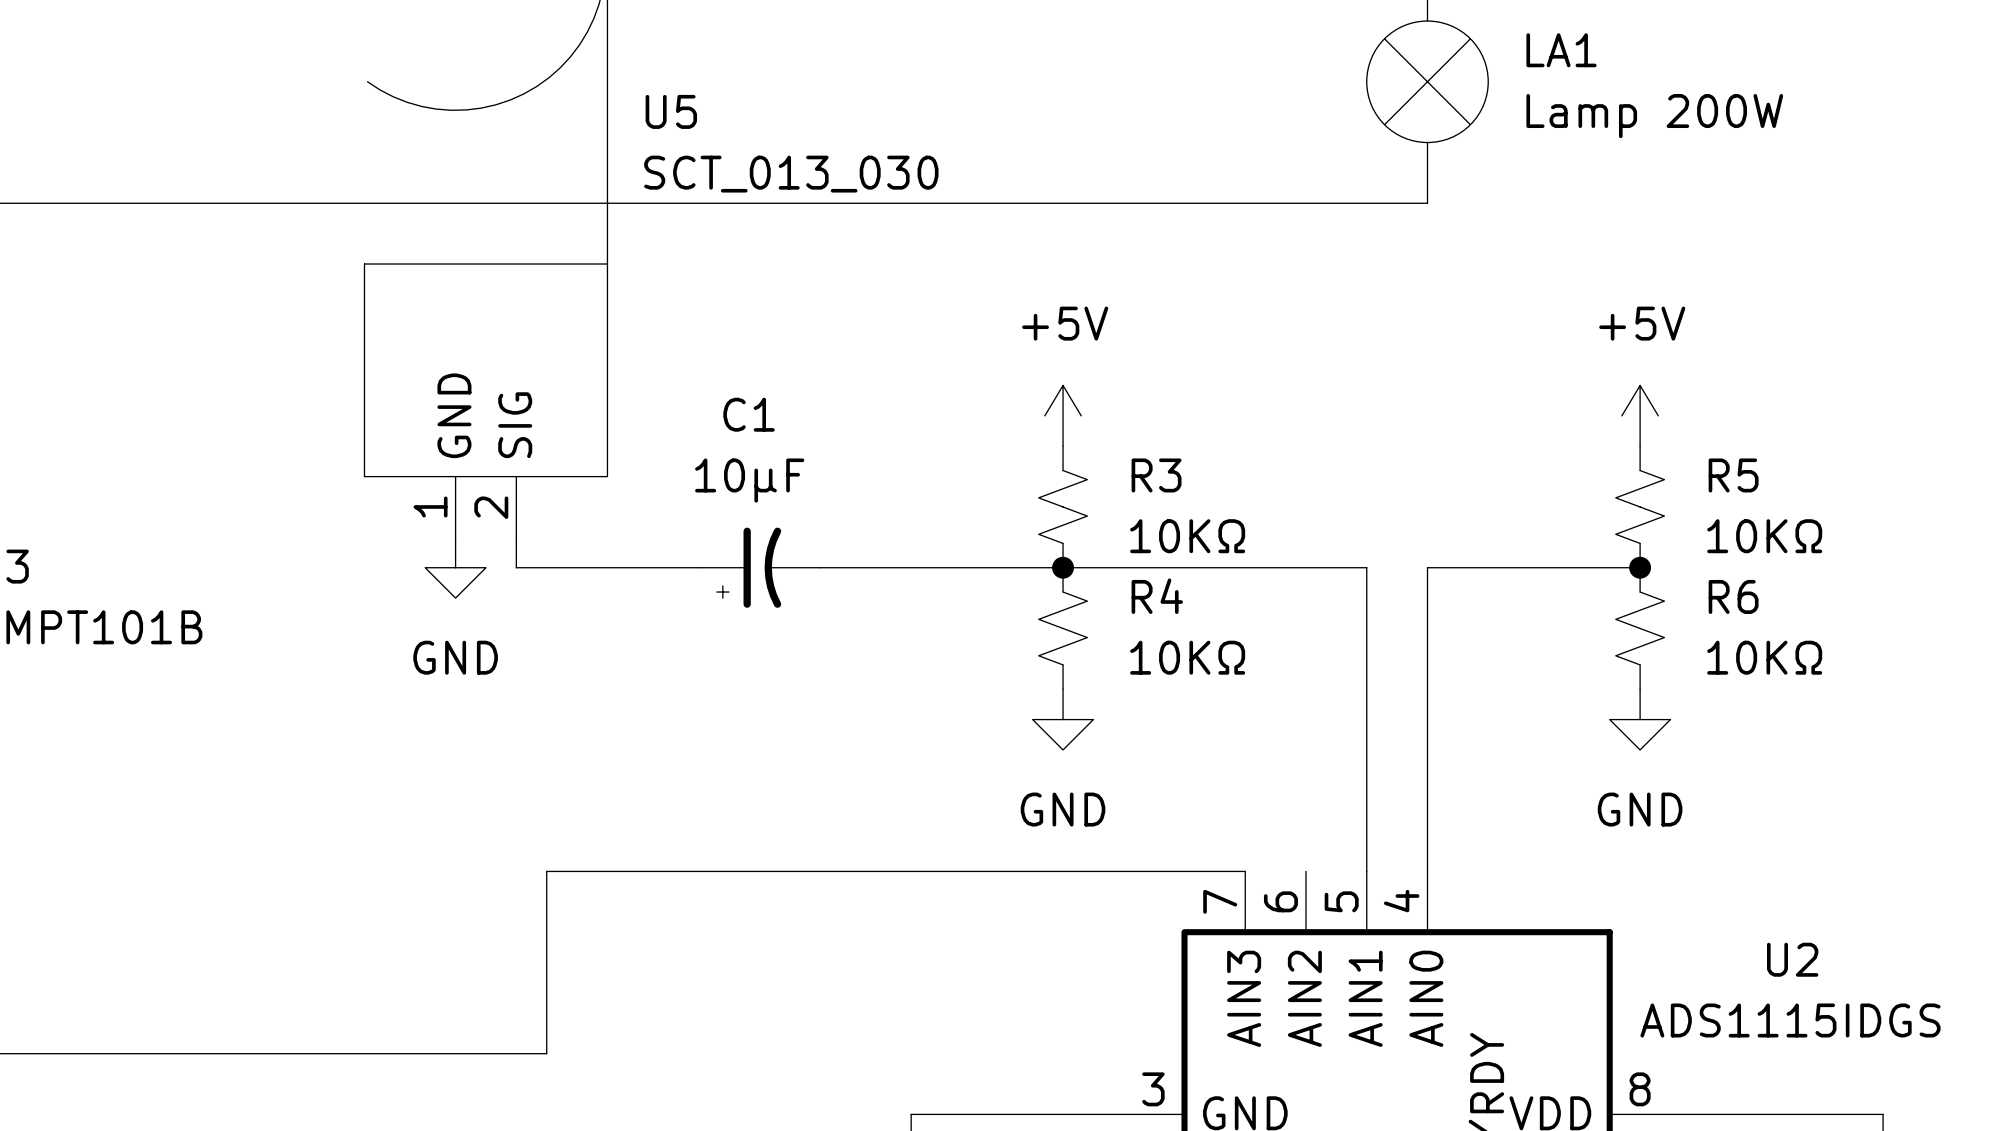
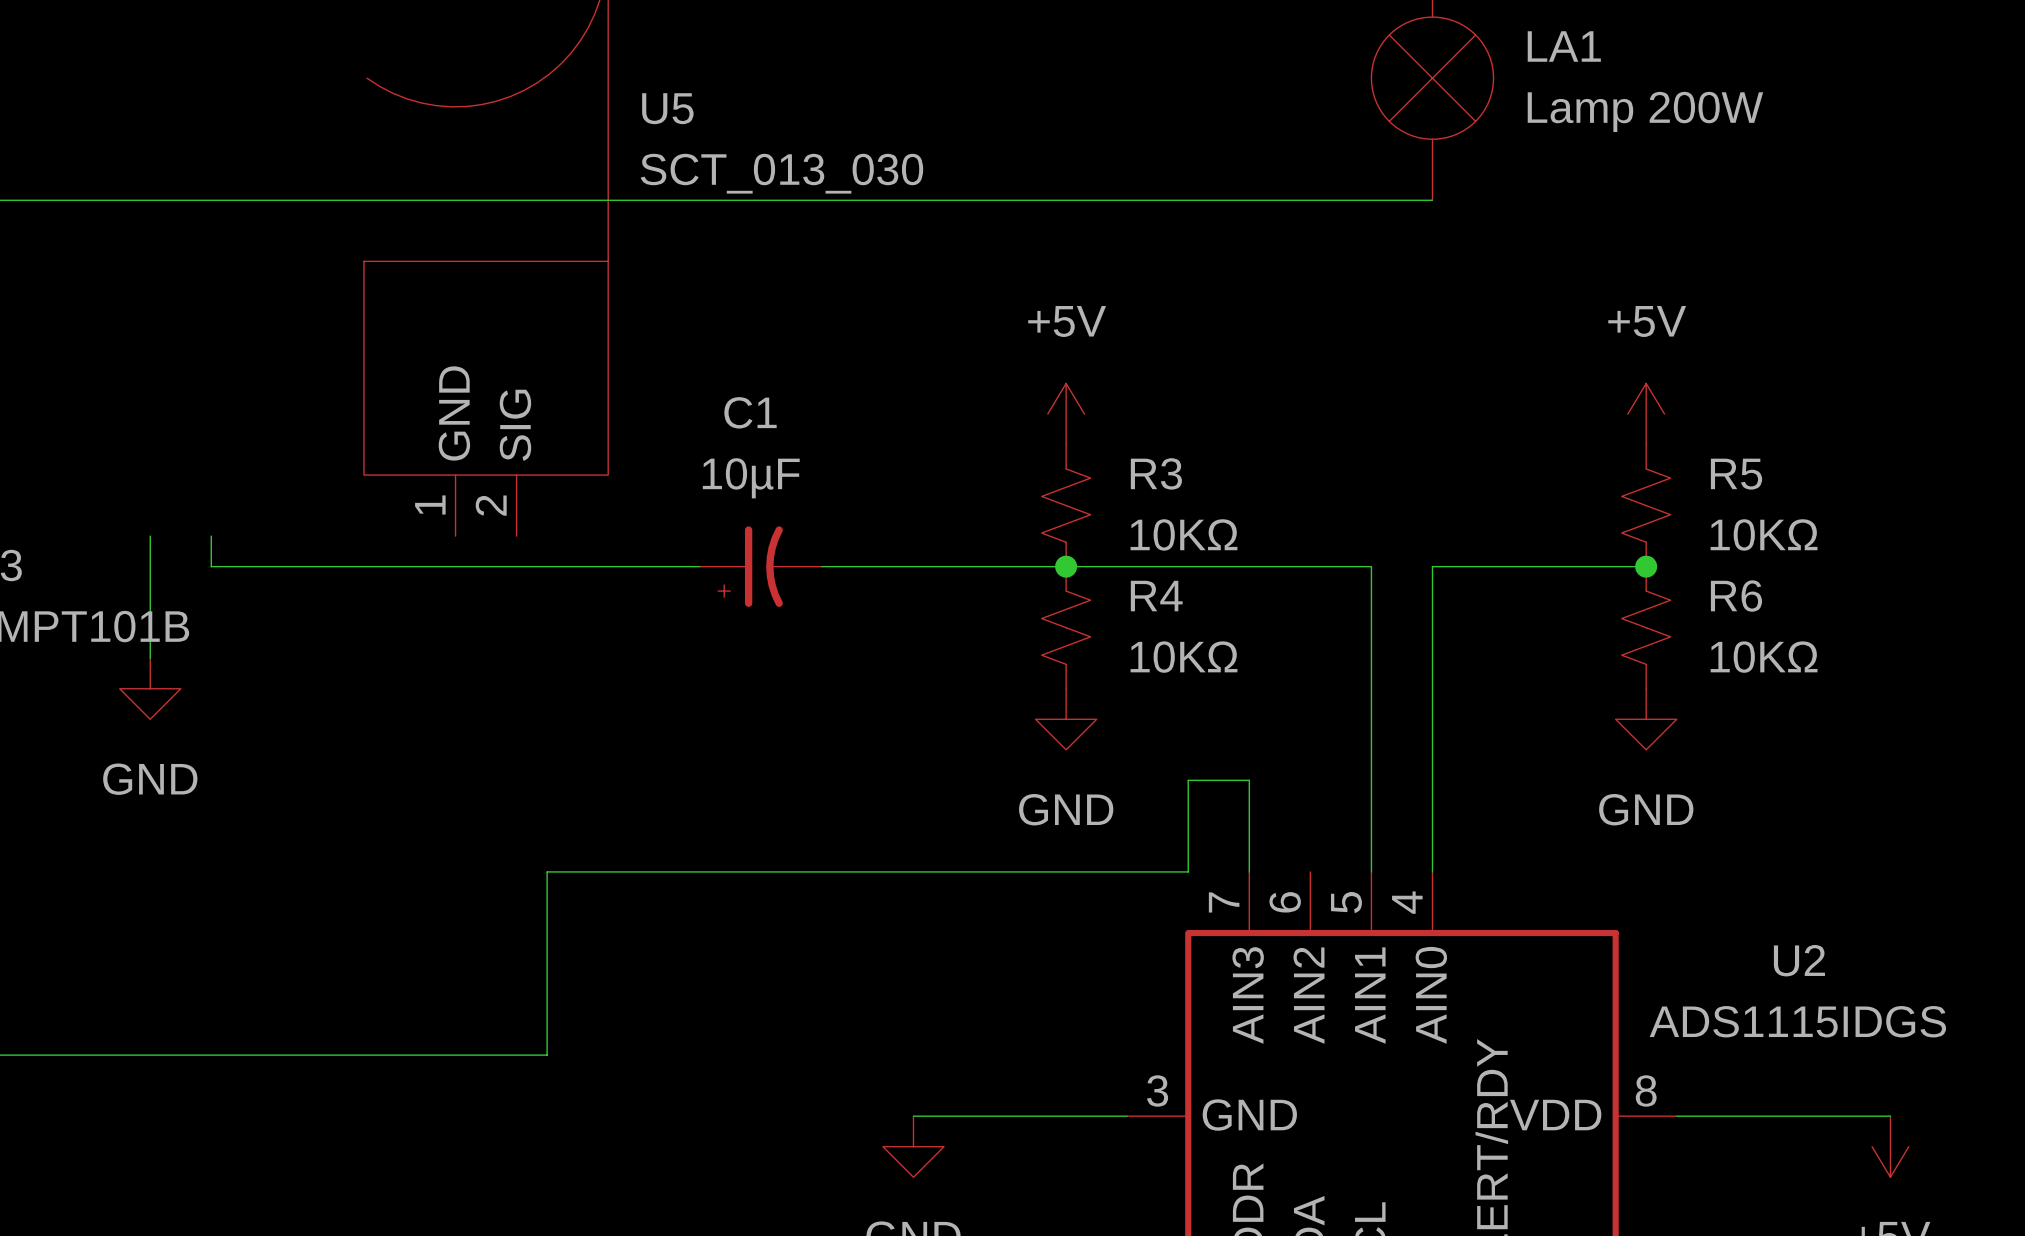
wire: none -> (150, 536) (150, 658)
wire: (516, 537) (516, 567) -> (211, 536) (211, 566) (516, 566)
power symbol: GND (455, 567) -> none
power symbol: none -> GND (150, 688)
wire: (1184, 871) (1245, 871) -> (1188, 871) (1188, 780) (1249, 780) (1249, 871)

